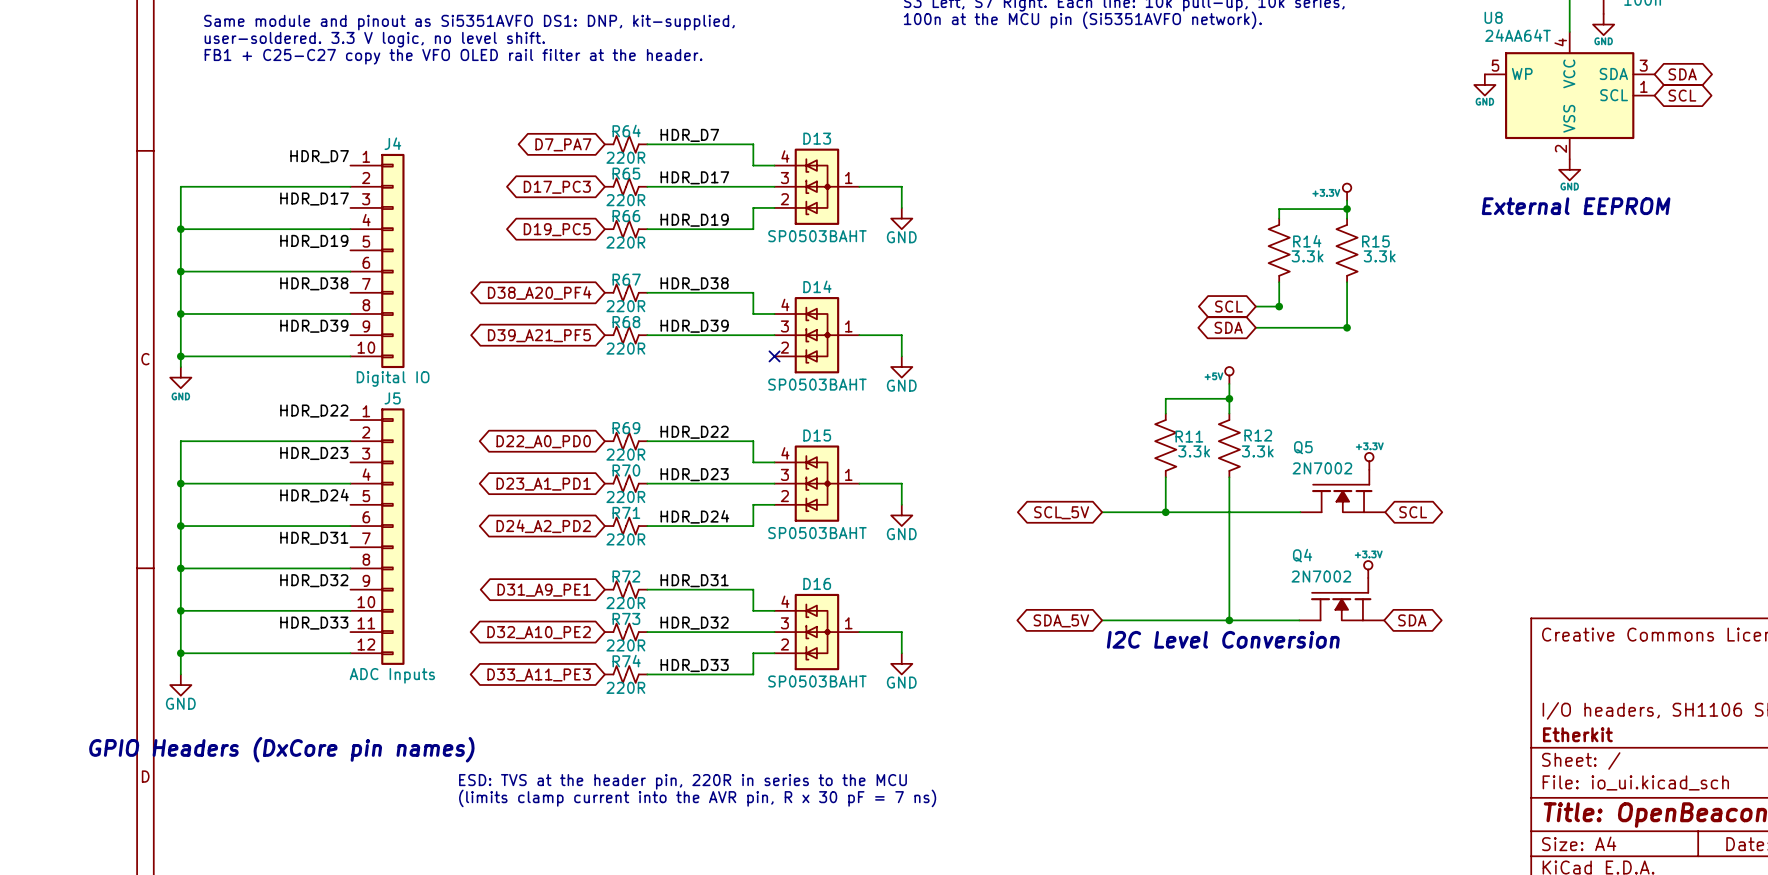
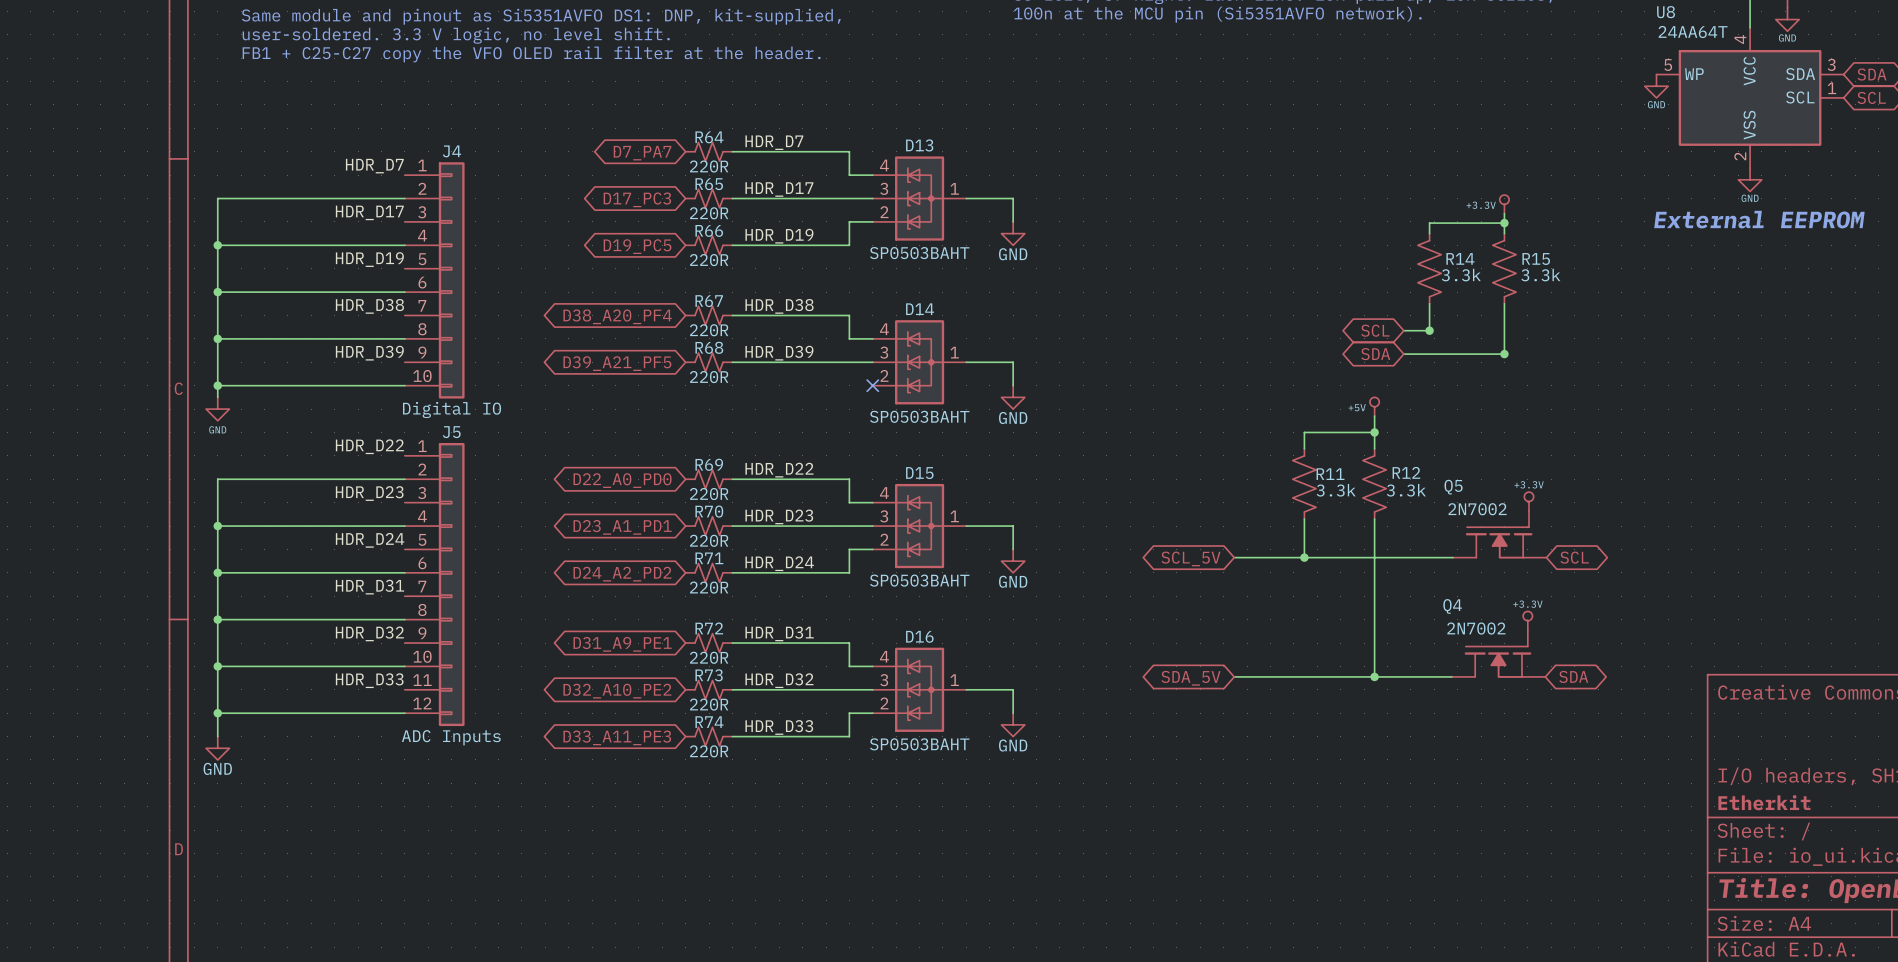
text: I2C Level Conversion (1223, 639) -> none
text: GPIO Headers (DxCore pin names) (281, 749) -> none
text: ESD: TVS at the header pin, 220R in series to the MCU (682, 781) -> none
text: (limits clamp current into the AVR pin, R x 30 pF = 7 ns) (697, 798) -> none

